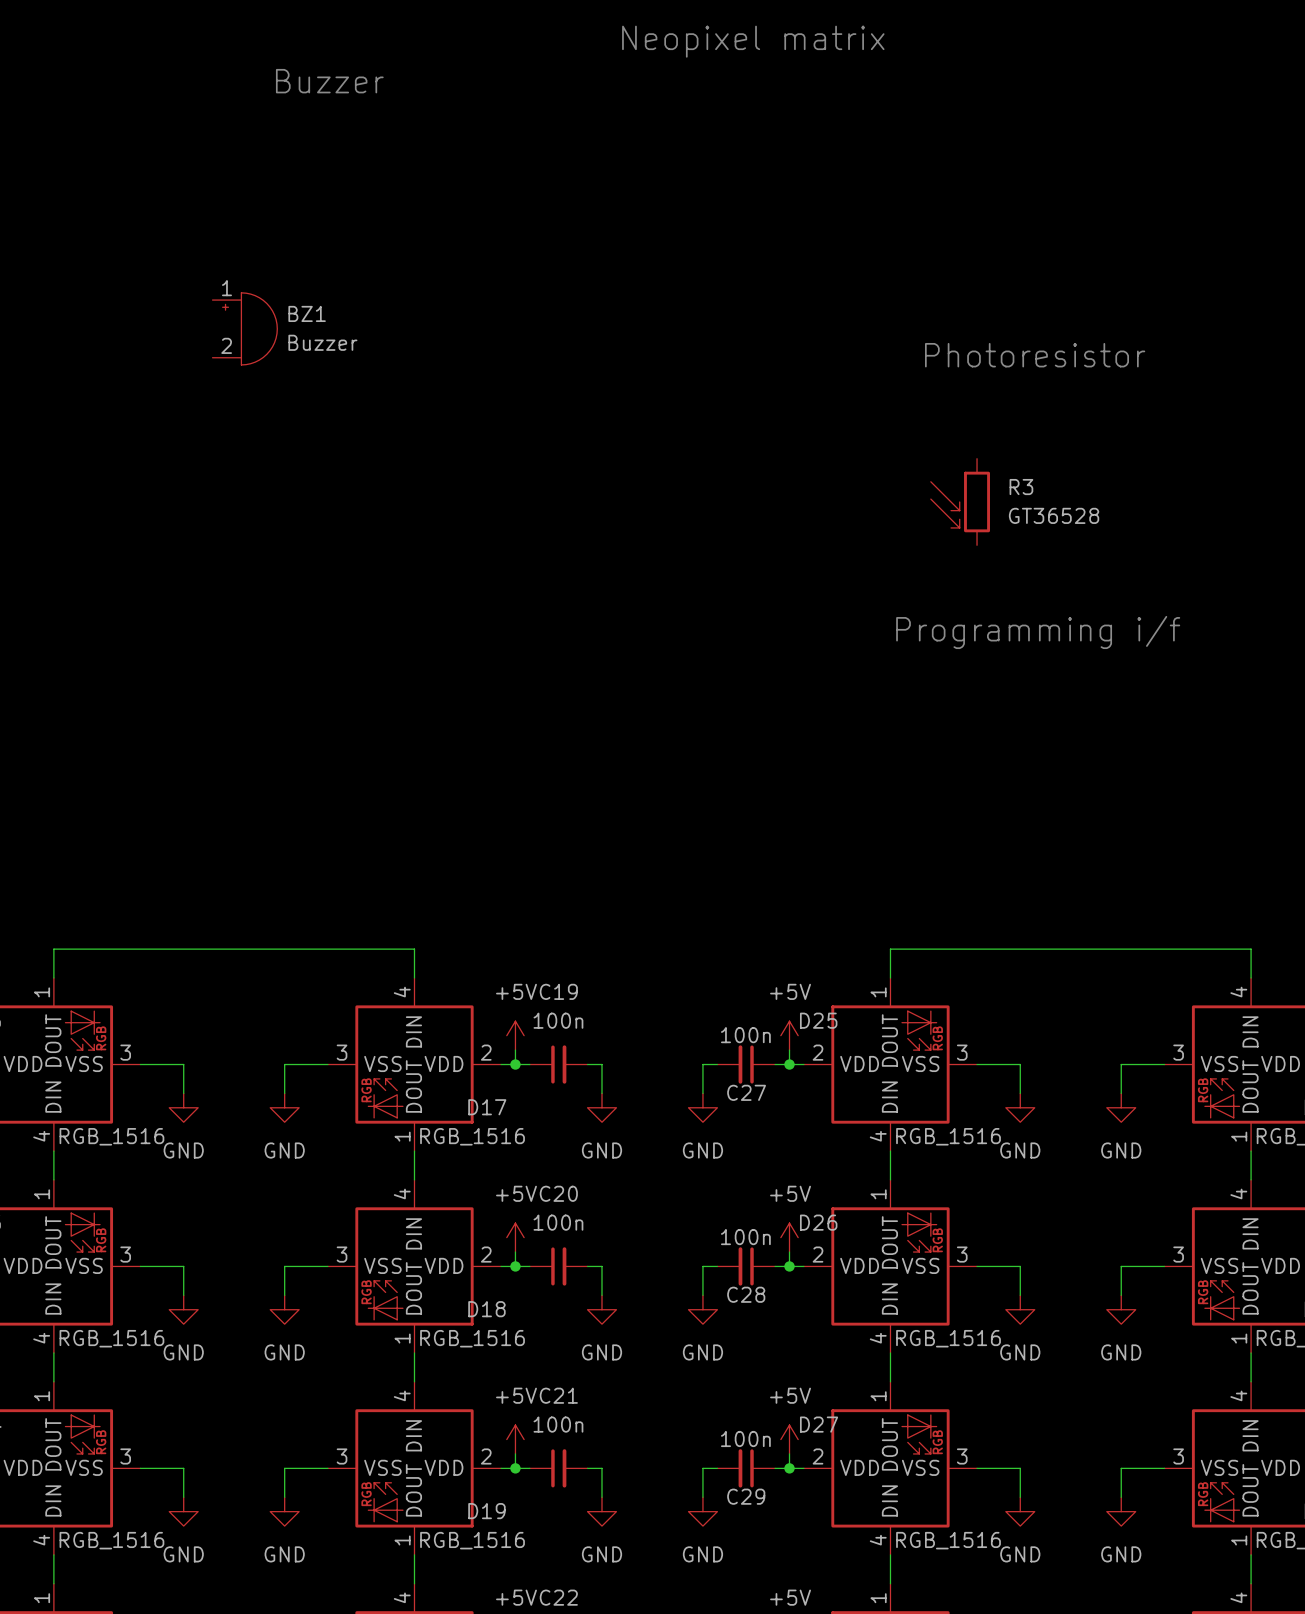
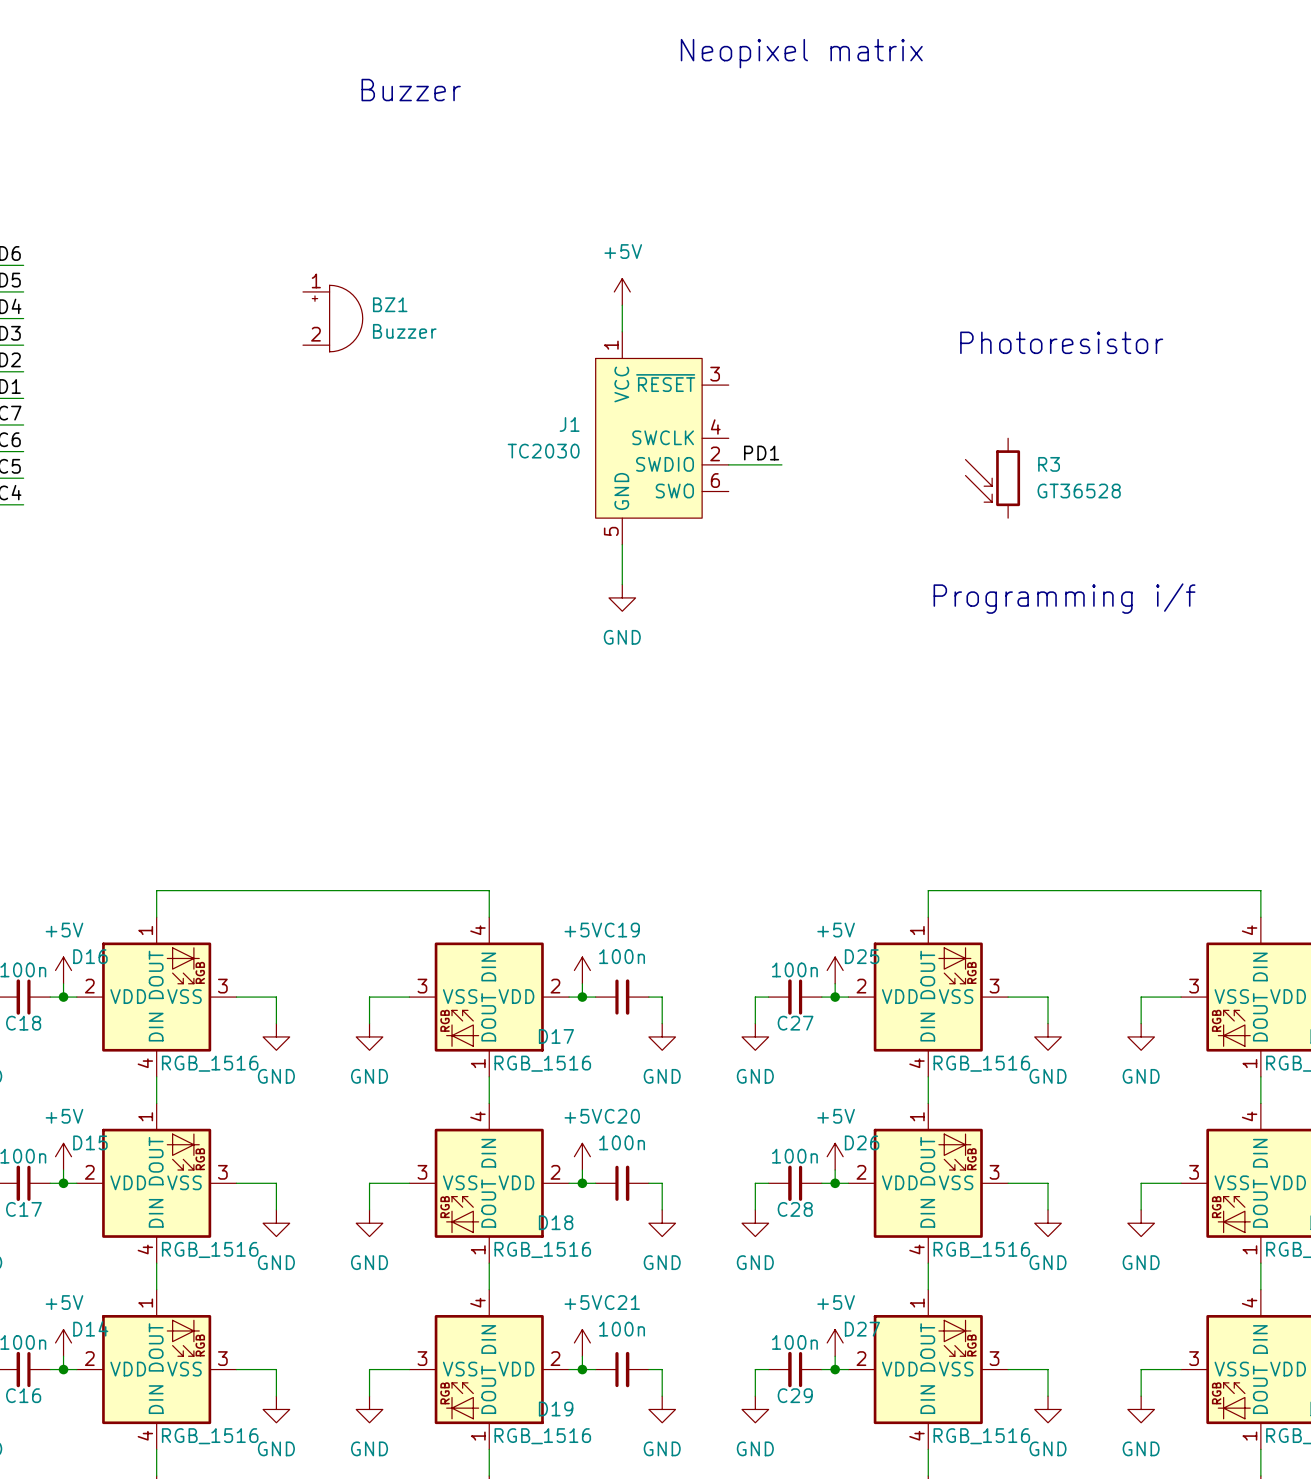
power symbol: none -> +5V (622, 291)
wire: none -> (622, 305) (622, 331)
J1: none -> TC2030 (662, 438)
label: none -> PD1 (761, 453)
wire: none -> (728, 464) (781, 464)
wire: none -> (622, 544) (622, 584)
power symbol: none -> GND (622, 597)

